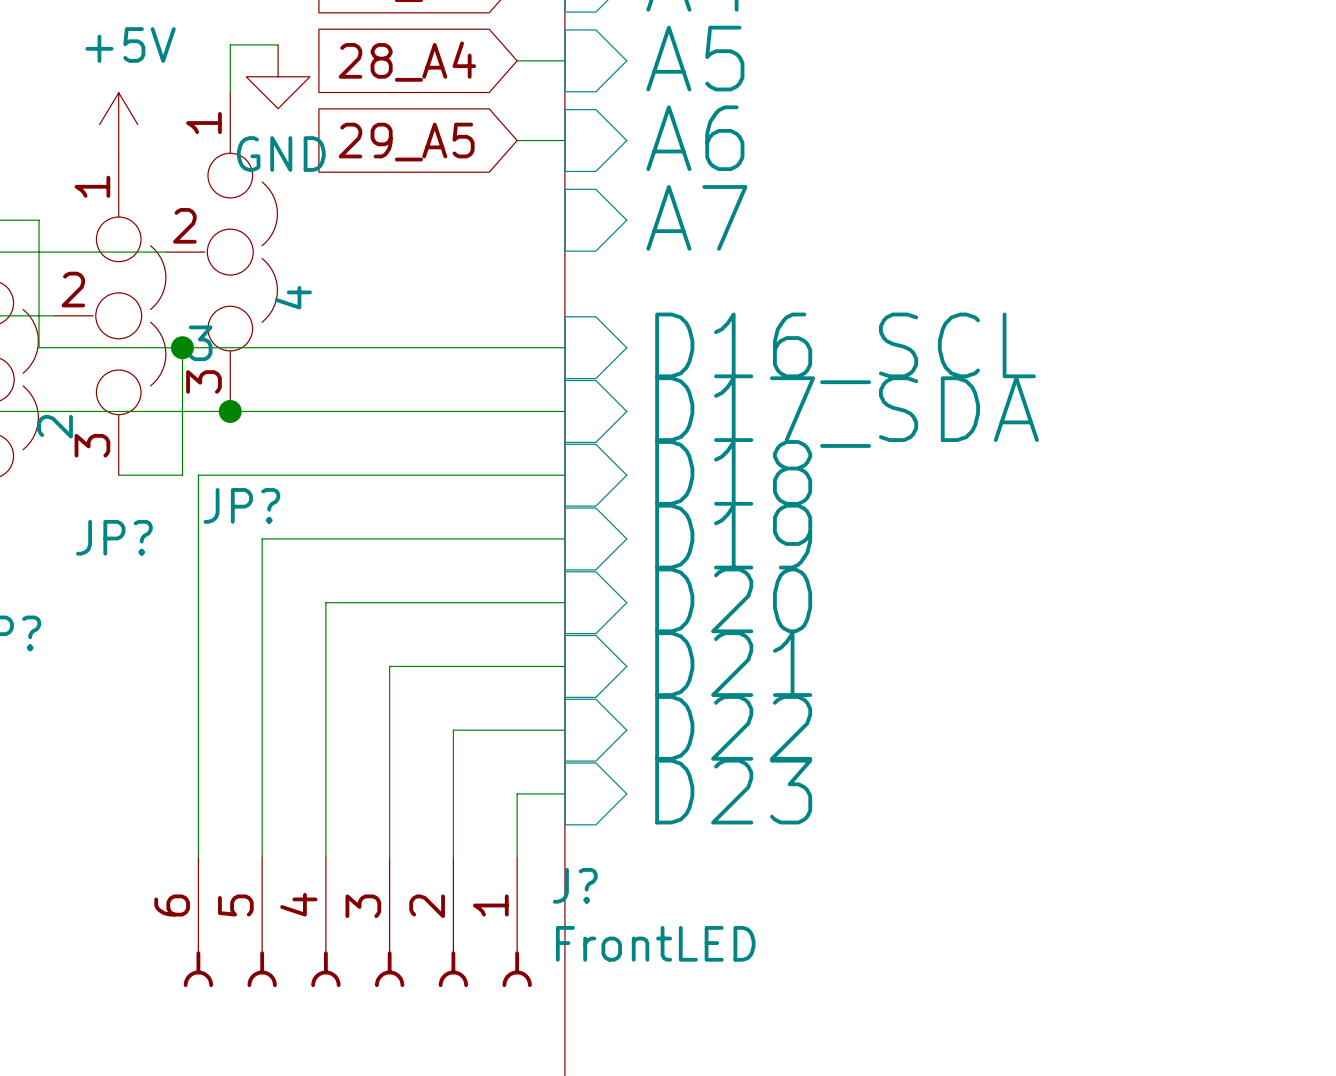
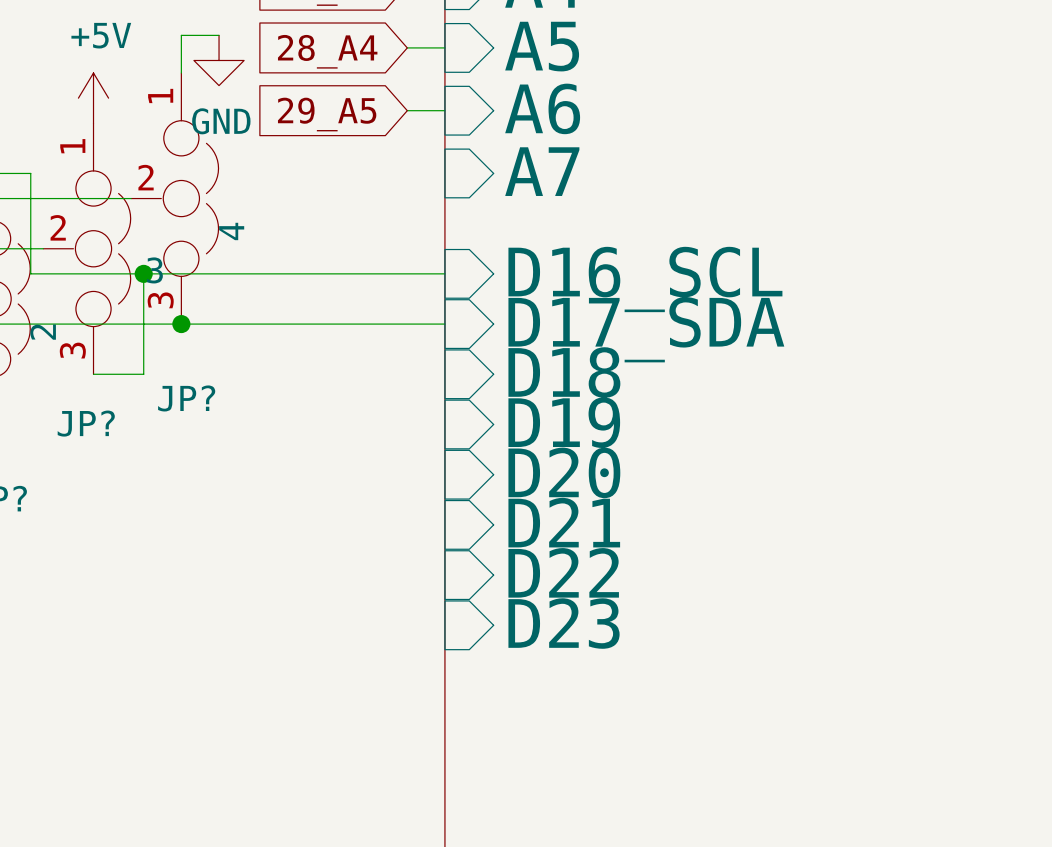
wire: (564, 475) (198, 475) (198, 857) -> none
wire: (564, 538) (262, 538) (262, 857) -> none
wire: (564, 602) (325, 602) (325, 857) -> none
wire: (564, 666) (389, 666) (389, 857) -> none
wire: (564, 730) (453, 730) (453, 857) -> none
wire: (564, 793) (517, 793) (517, 857) -> none
J?: FrontLED (357, 922) -> none

